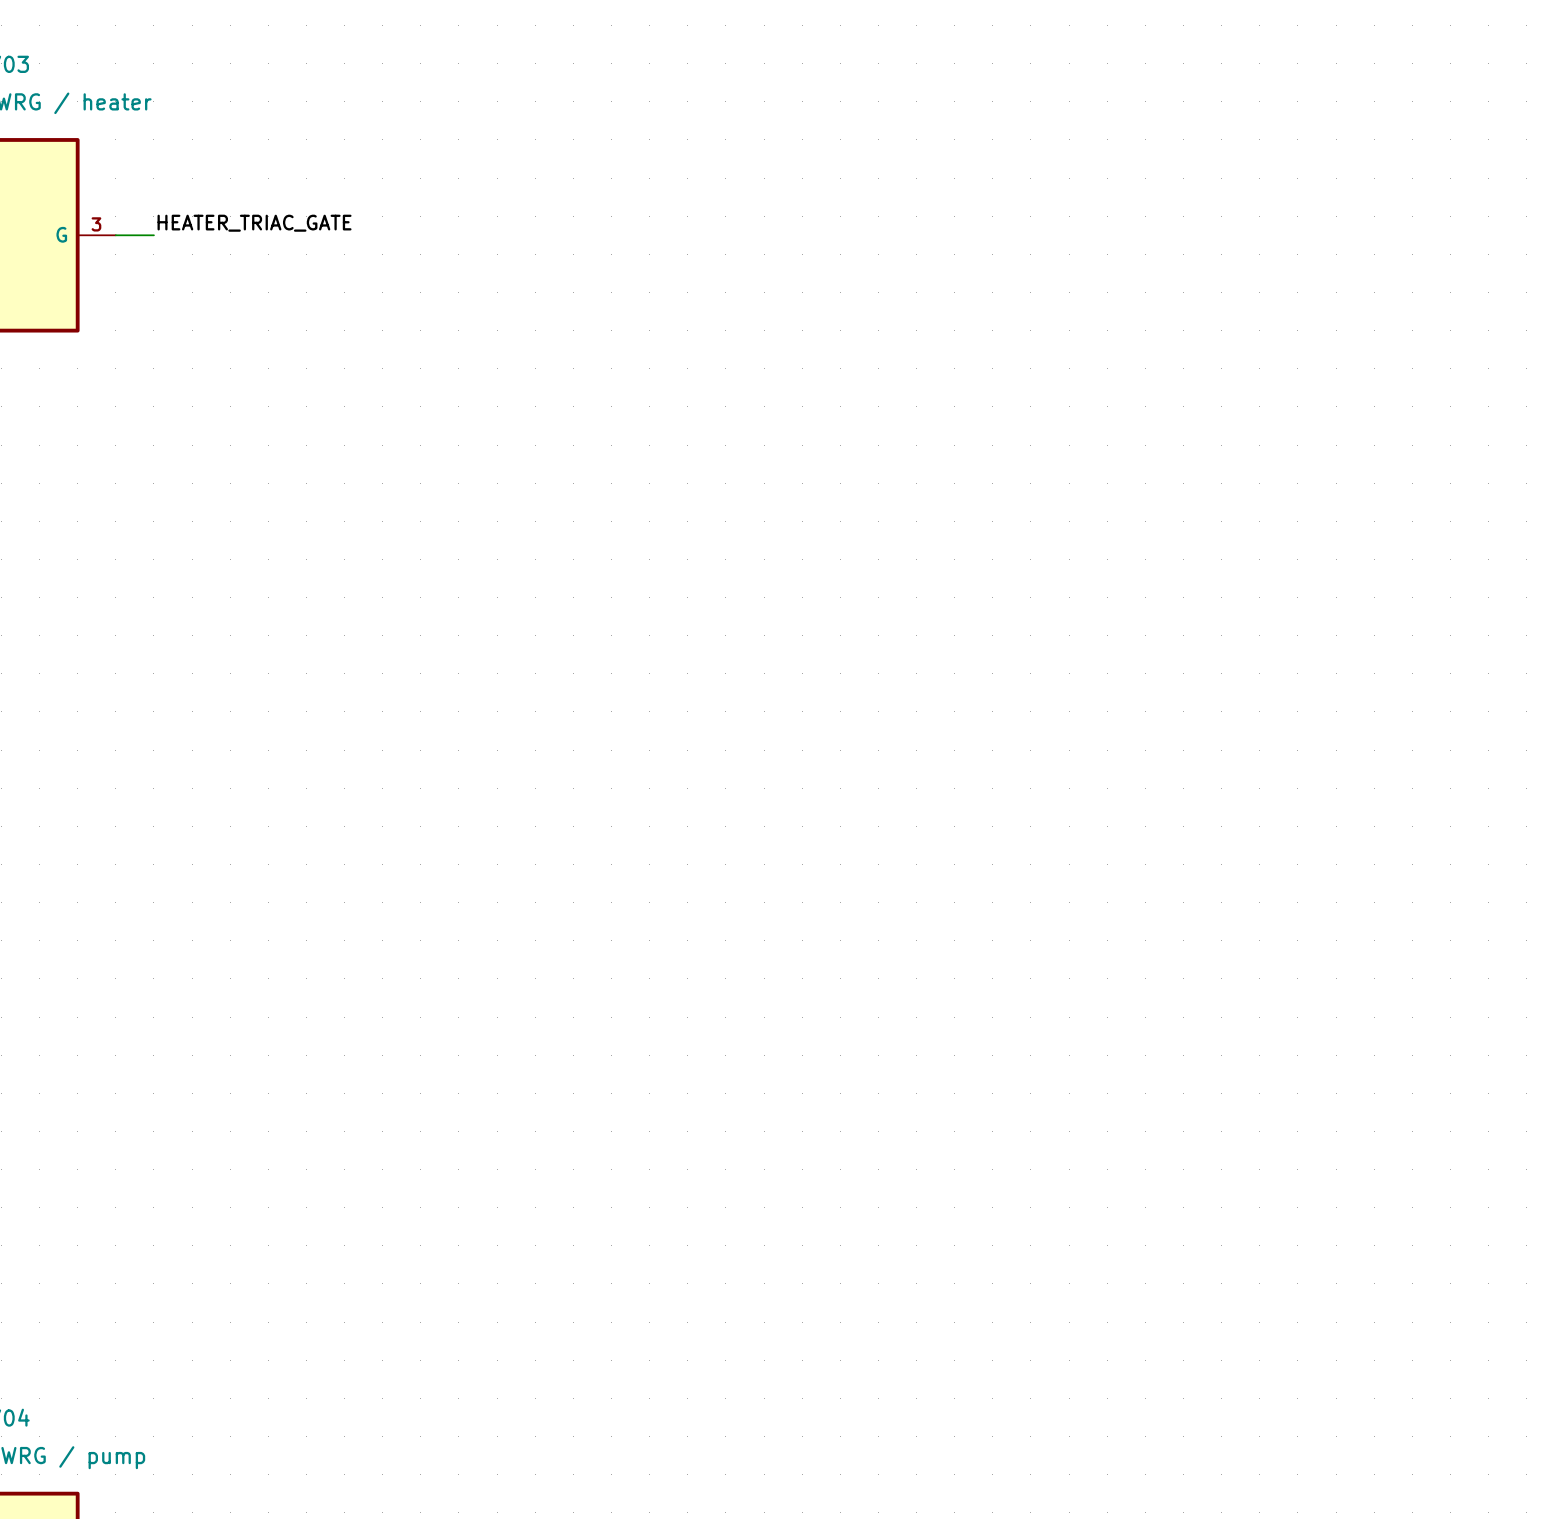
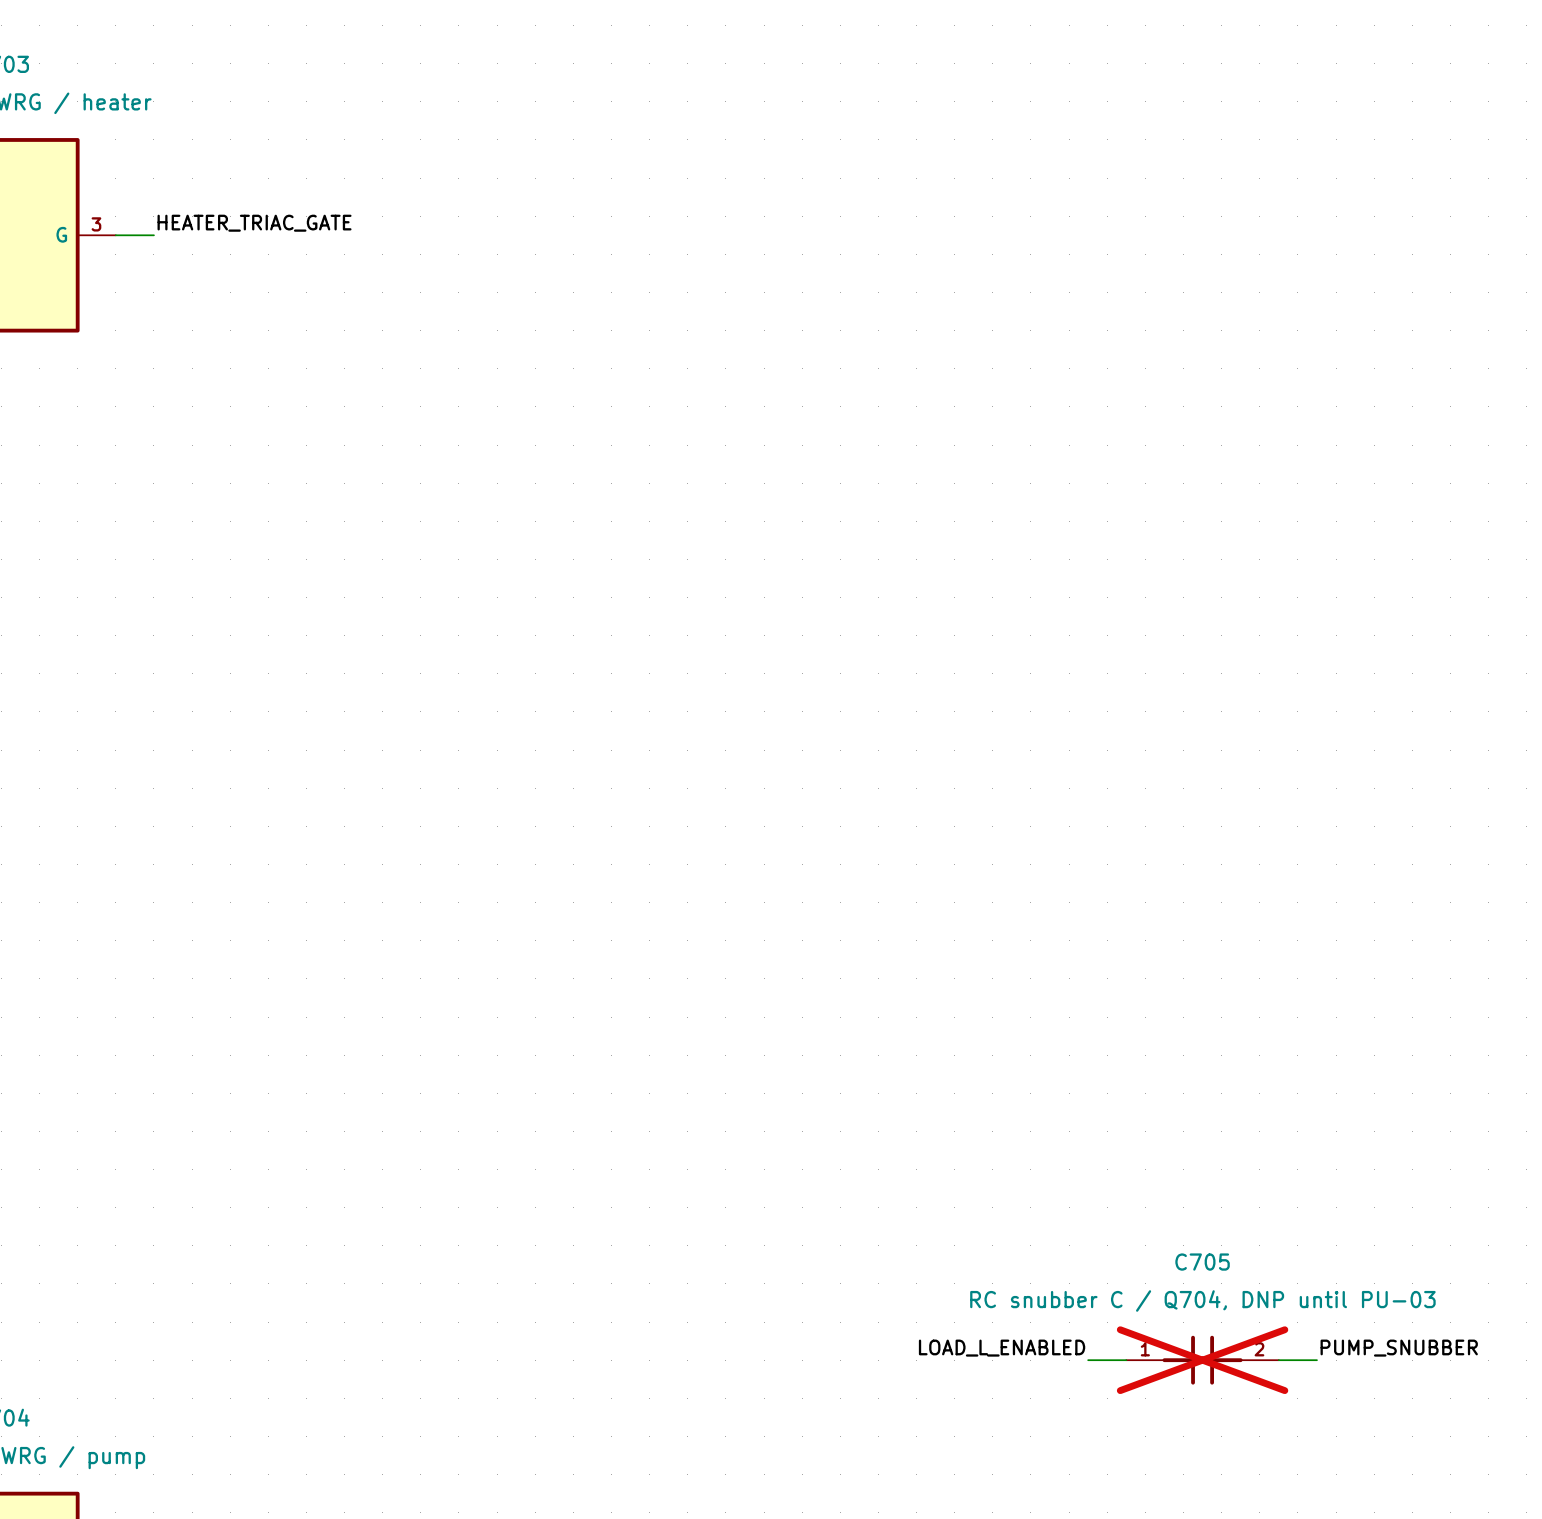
label: none -> LOAD_L_ENABLED (1002, 1348)
label: none -> PUMP_SNUBBER (1399, 1348)
wire: none -> (1088, 1360) (1126, 1360)
C705: none -> RC snubber C / Q704, DNP until PU-03 (1202, 1360)
wire: none -> (1278, 1360) (1316, 1360)

